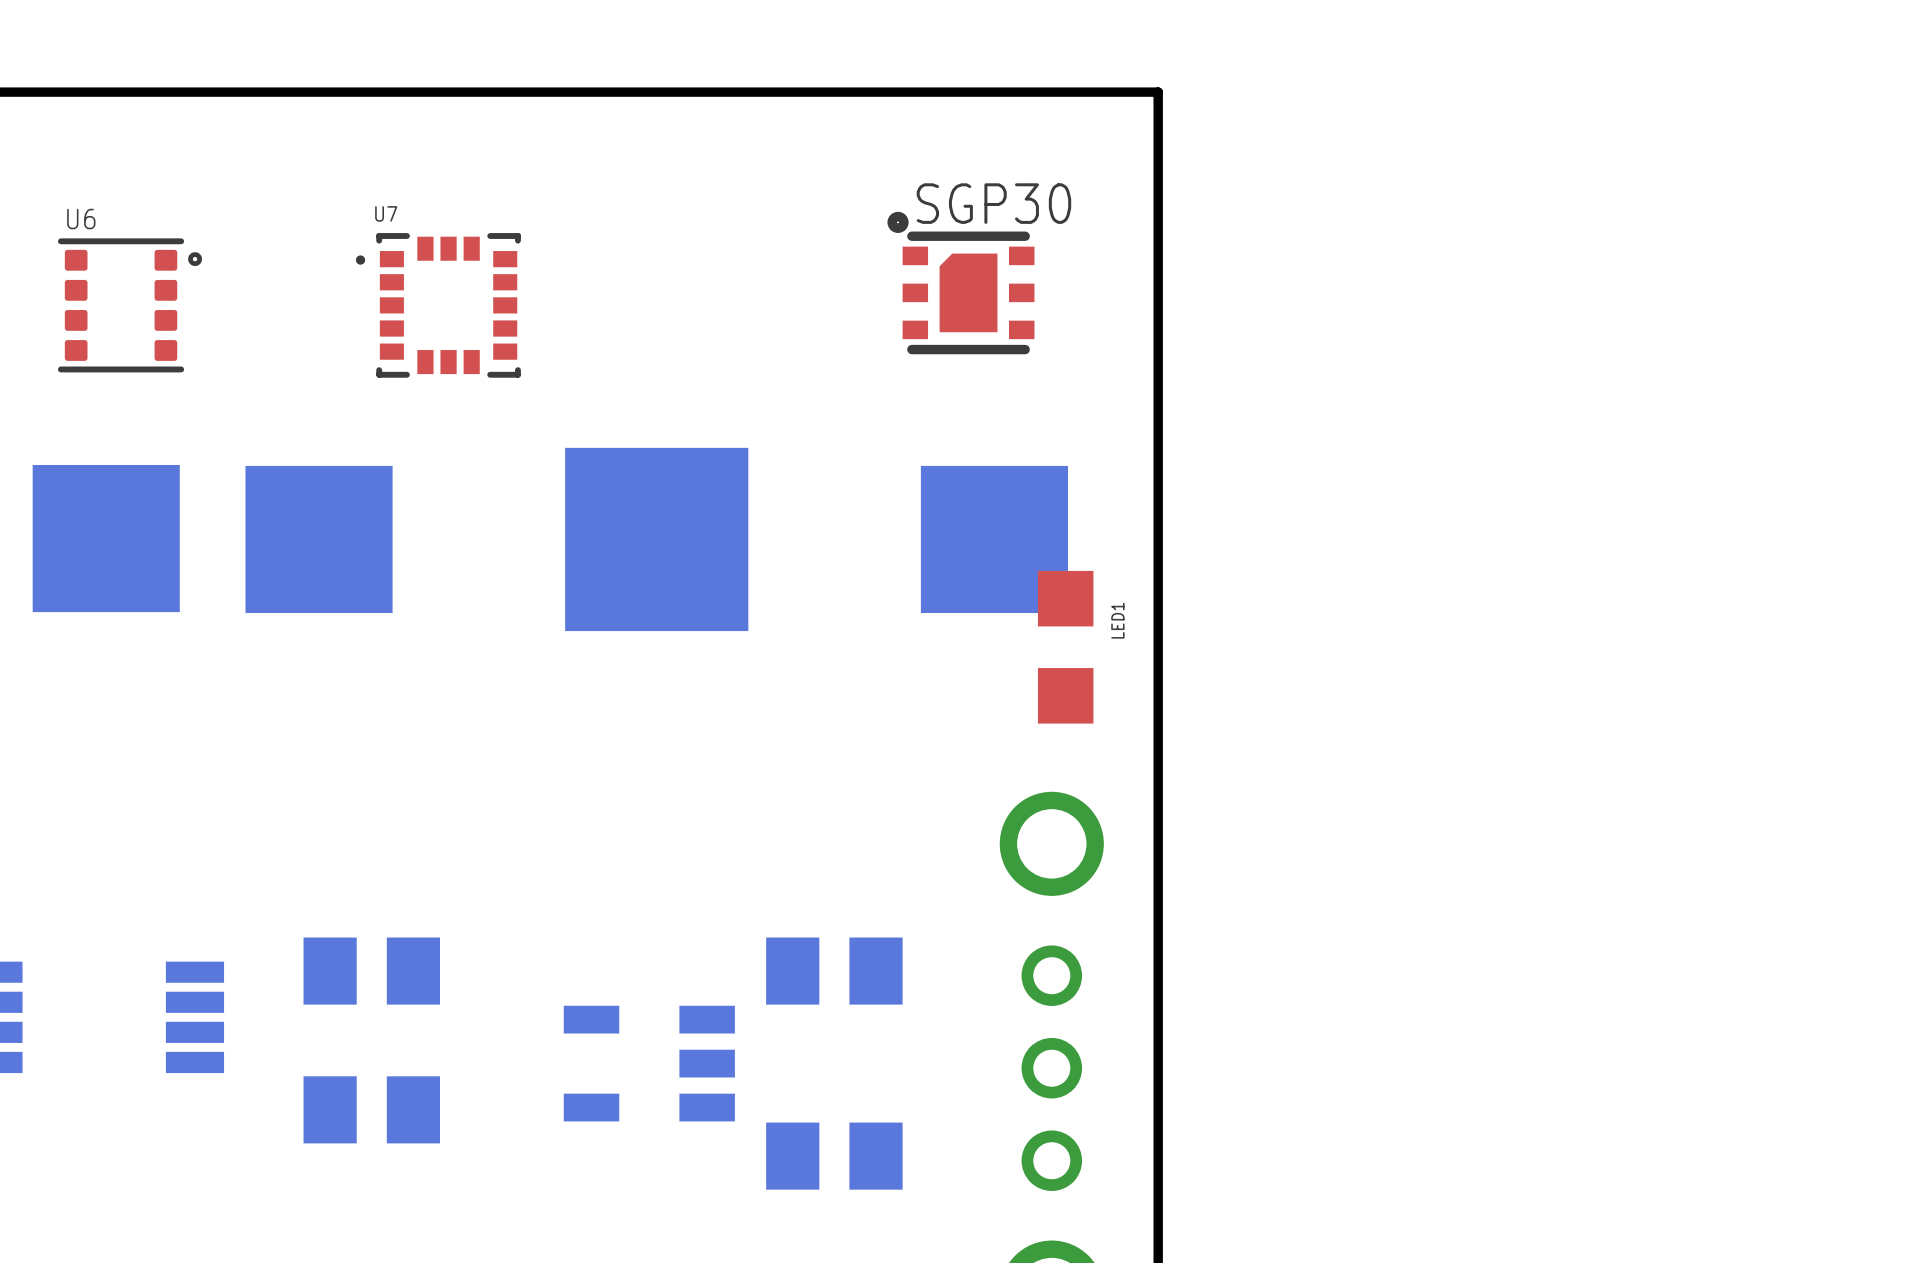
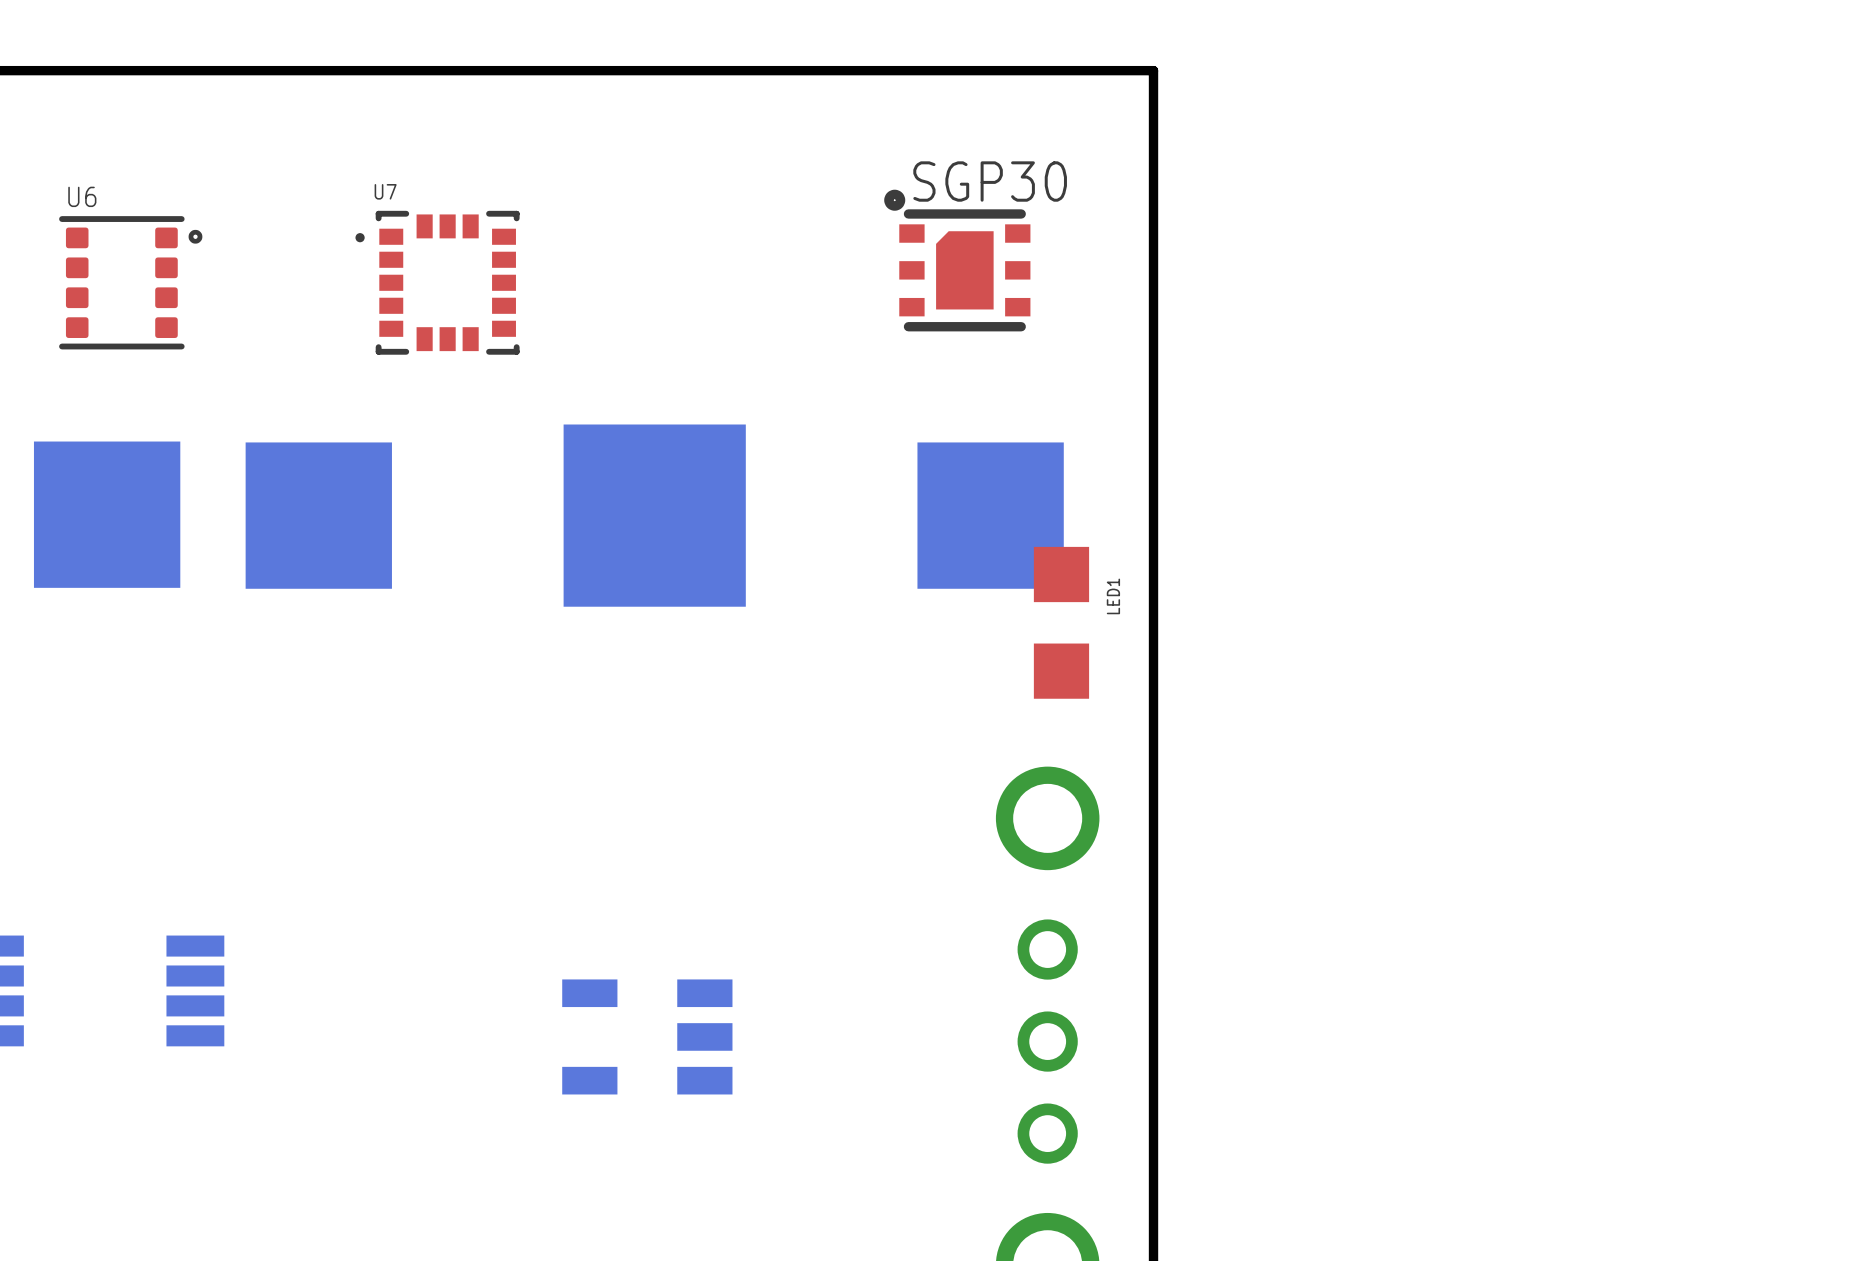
part: (371, 971) -> none
part: (834, 971) -> none
part: (371, 1109) -> none
part: (834, 1156) -> none

